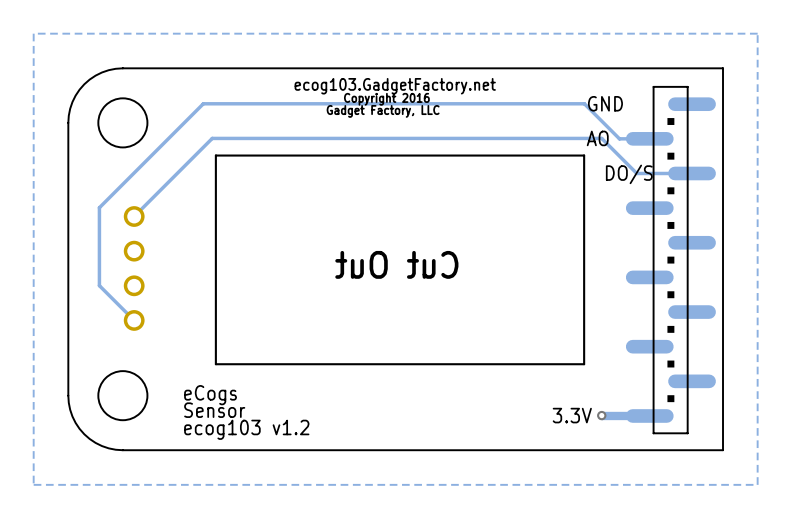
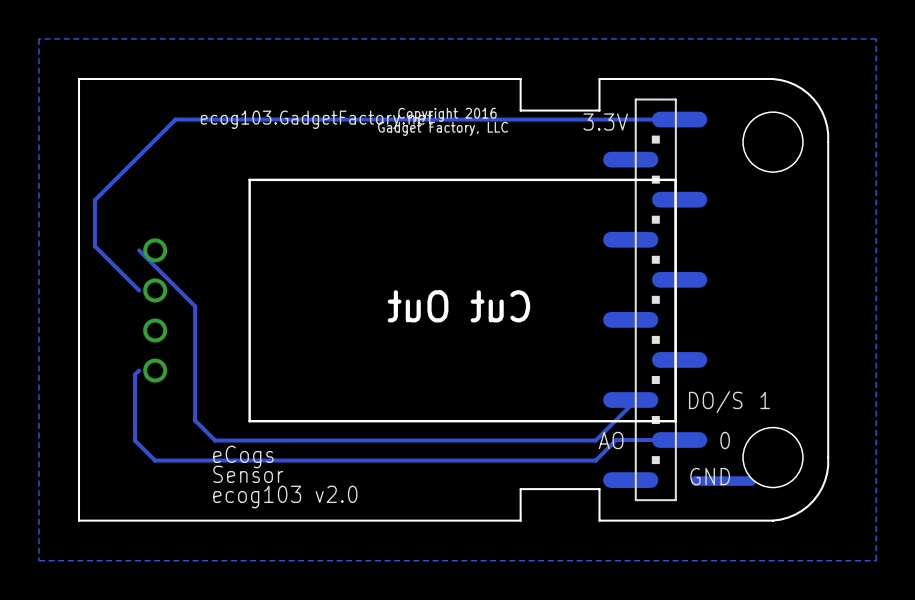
part footprint: [67, 67, 724, 452] -> [78, 78, 830, 522]
text position: ecog103.GadgetFactory.net (395, 86) -> ecog103.GadgetFactory.net (316, 119)
track: none -> (679, 119) (175, 119) (94, 200) (94, 246) (139, 290)
text position: GND (605, 103) -> GND (710, 476)
text position: AO (597, 138) -> AO (611, 440)
track: (649, 138) (619, 138) (584, 103) (203, 103) (99, 207) (99, 285) (134, 320) -> none
track: (692, 173) (636, 173) (601, 138) (212, 138) (134, 216) -> none
text position: DO/S (629, 174) -> DO/S (715, 401)
track: none -> (139, 250) (195, 306) (195, 420) (215, 440) (595, 440) (630, 405) (630, 400)
track: none -> (139, 370) (135, 374) (135, 440) (155, 460) (595, 460) (616, 440) (679, 440)
text: none -> 1 (765, 400)
text: none -> 0 (725, 440)
text position: 3.3V (572, 415) -> 3.3V (605, 122)
via: (601, 415) -> none
text: ecog103 v1.2 (246, 429) -> ecog103 v2.0 (285, 497)

